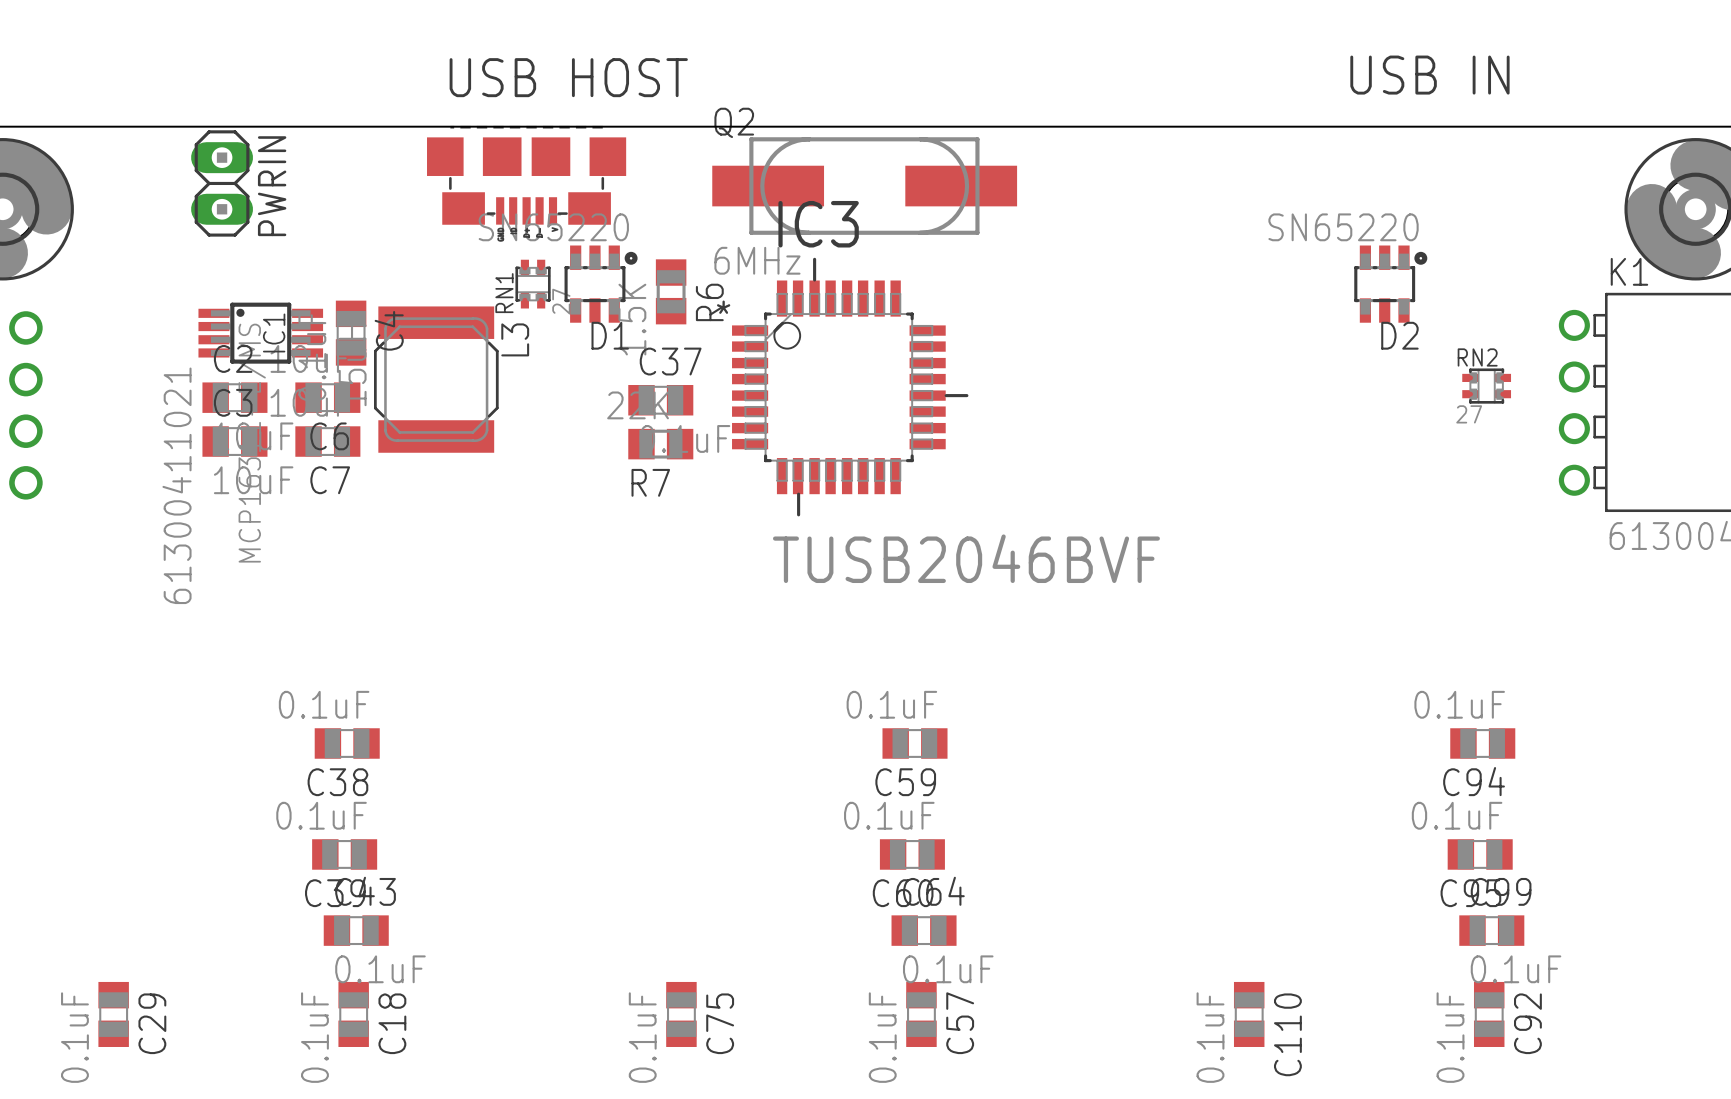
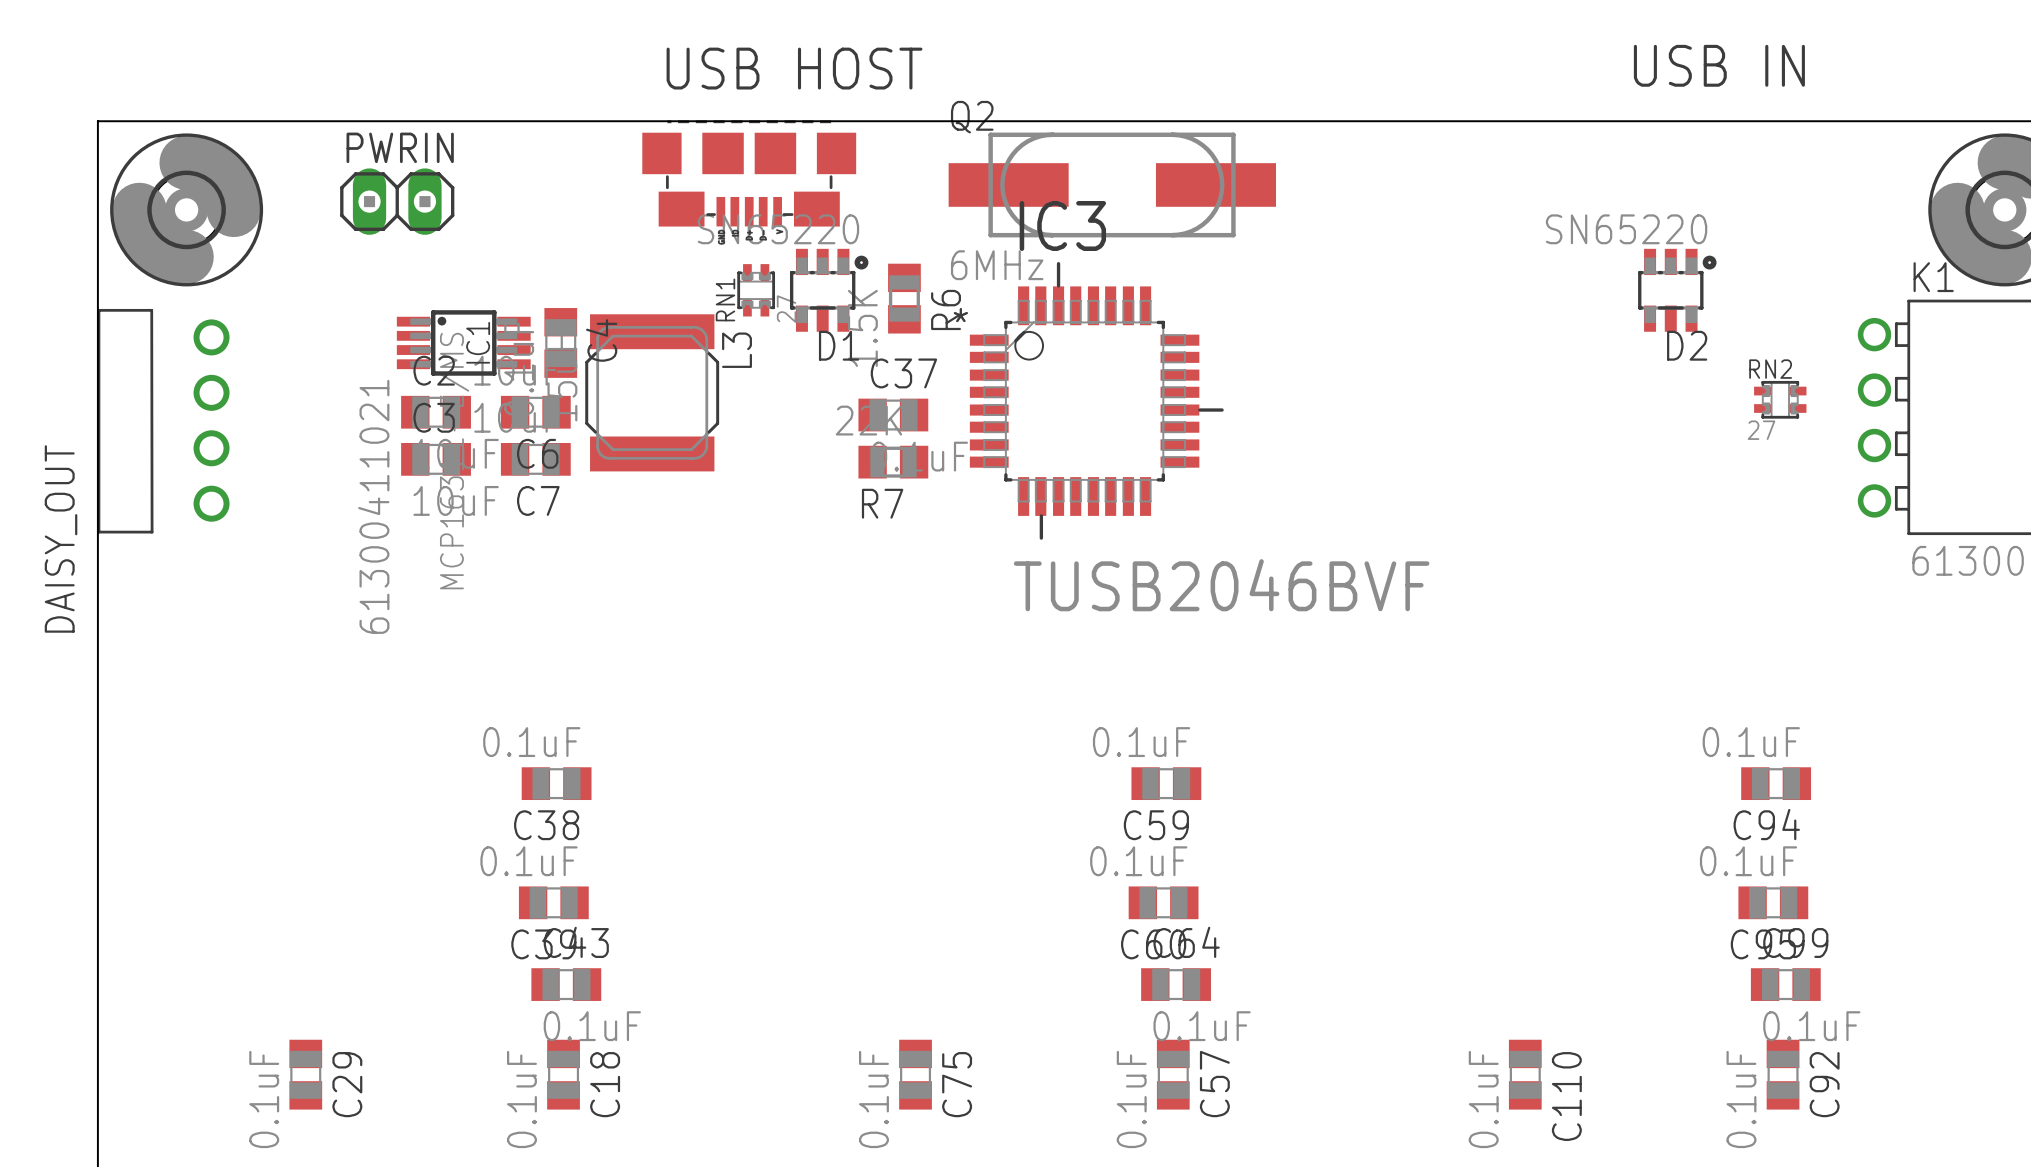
PWRIN rotation: 0° (222, 183) -> 90° clockwise (397, 201)
PWRIN name position: PWRIN (272, 186) -> PWRIN (400, 147)

